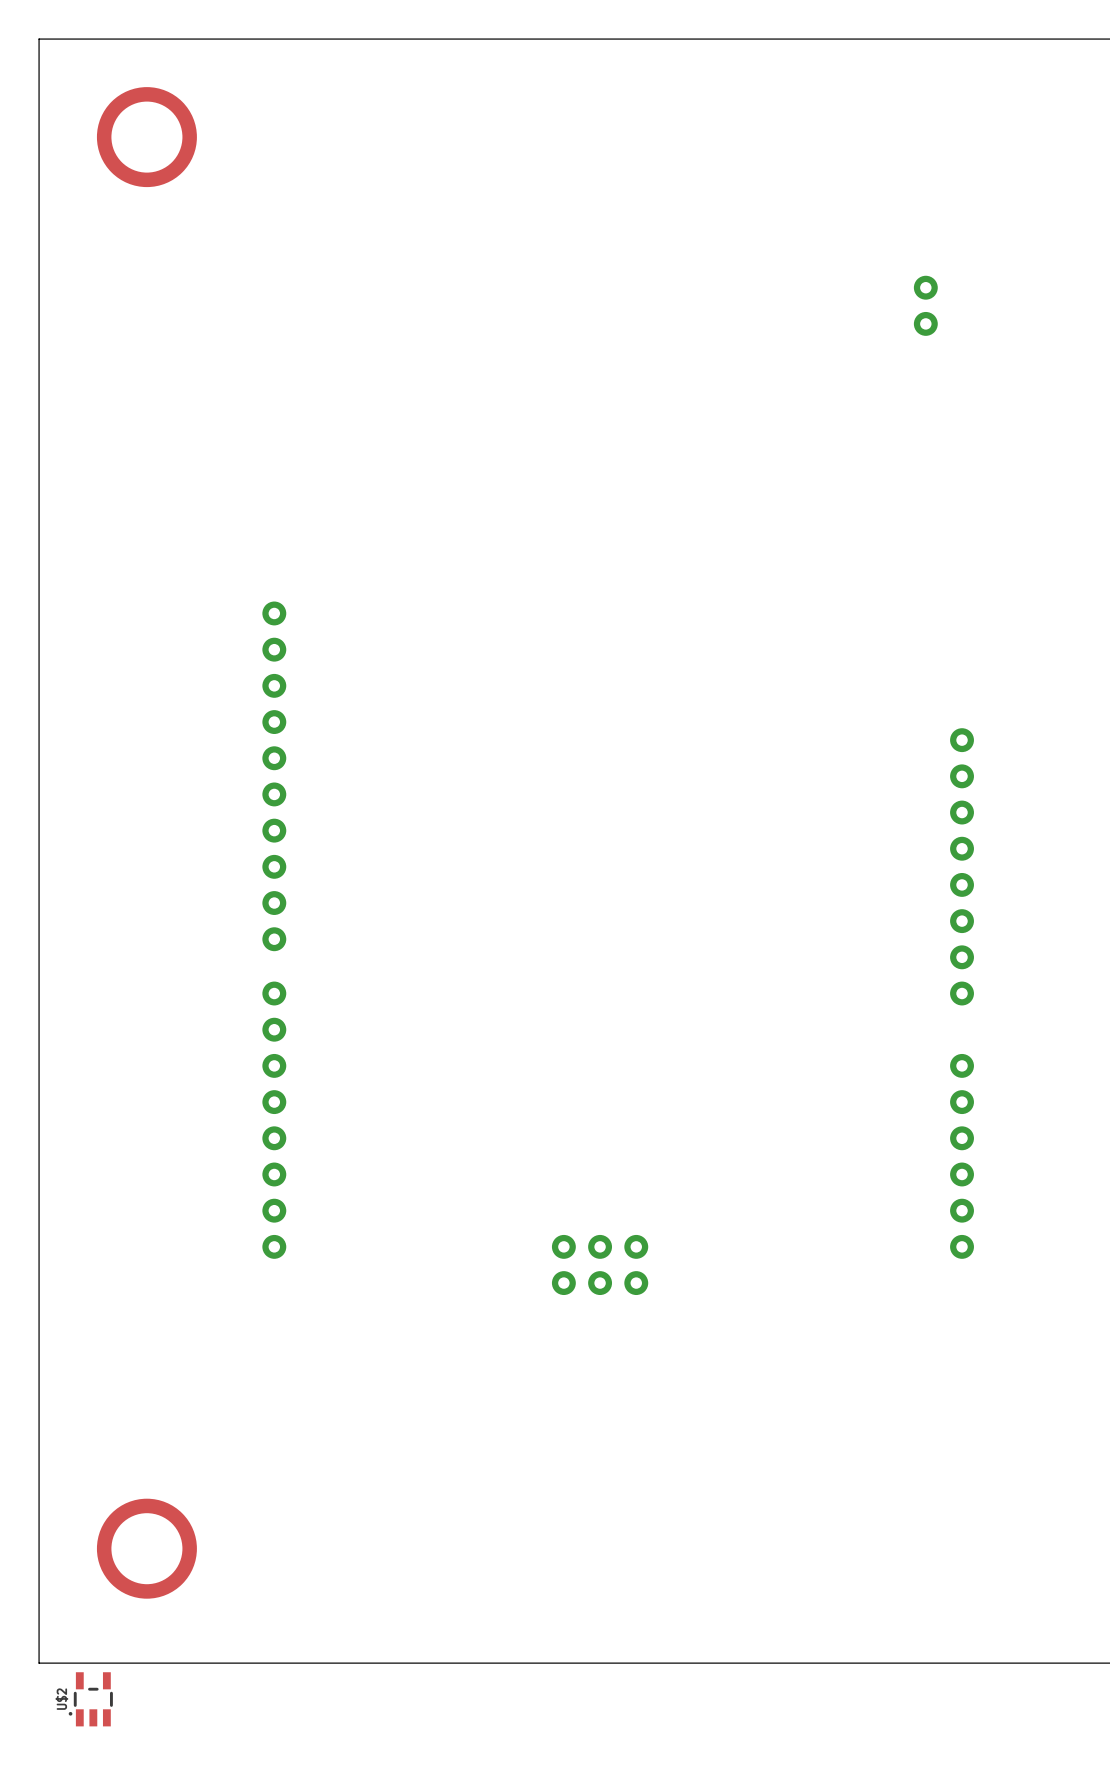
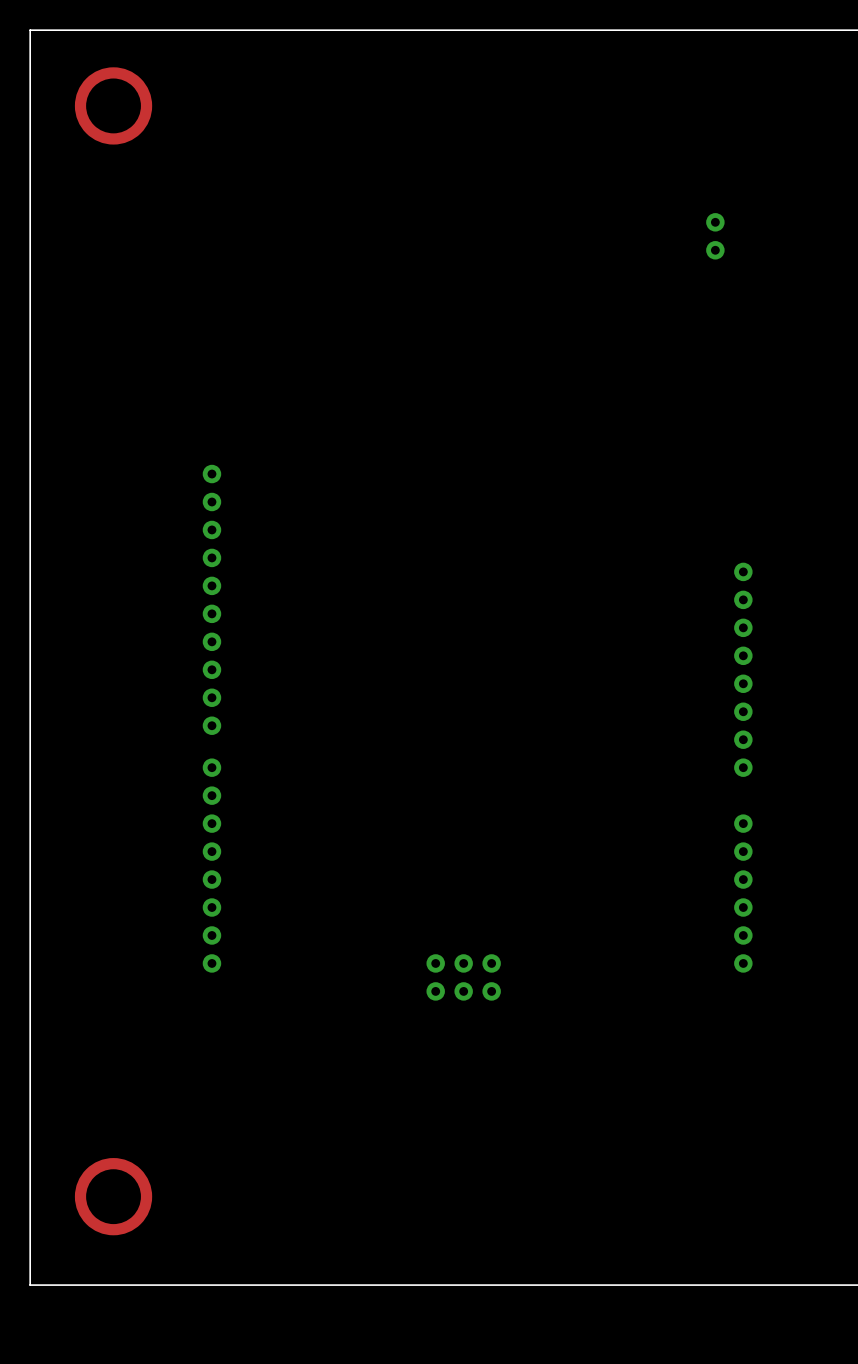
U$2: (90, 1699) -> none

